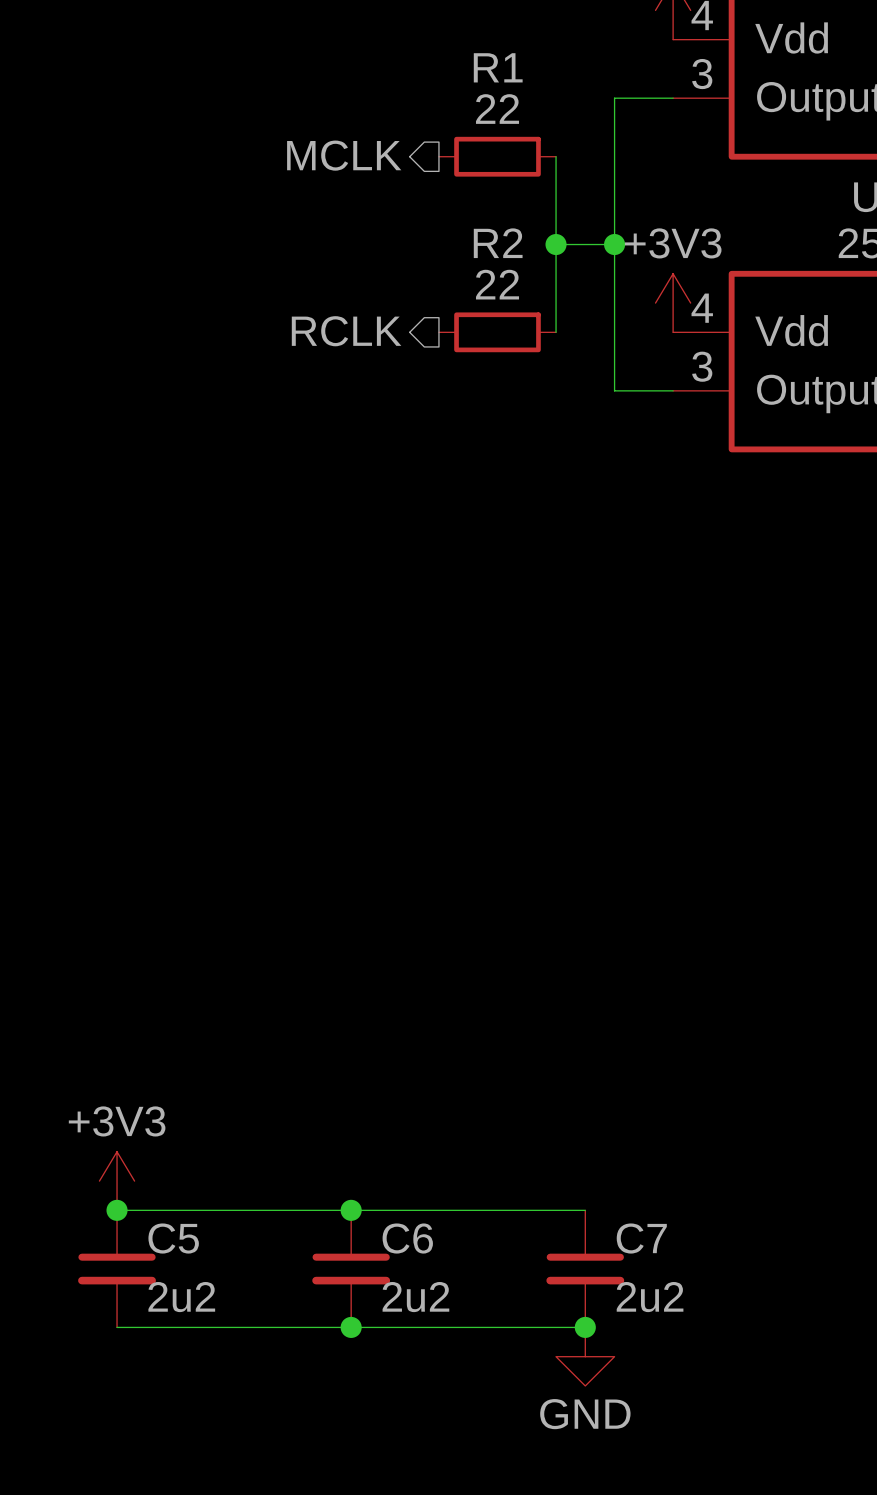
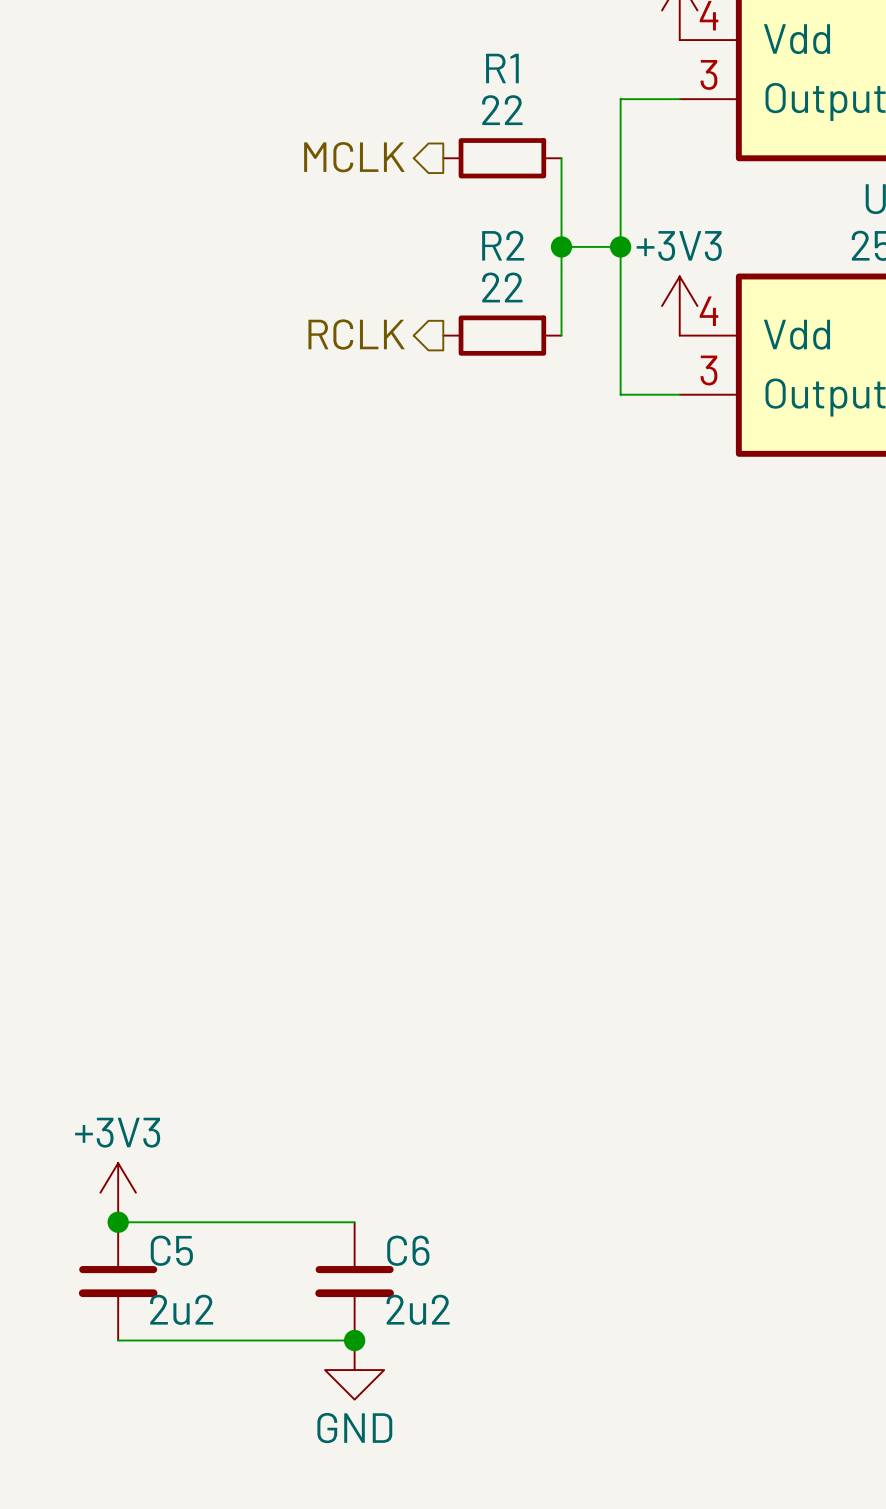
wire: (351, 1210) (585, 1210) -> none
junction: (351, 1210) -> none
C7: 2u2 (585, 1268) -> none
wire: (351, 1327) (585, 1327) -> none
junction: (585, 1327) -> none
power symbol position: GND (585, 1356) -> GND (354, 1370)

